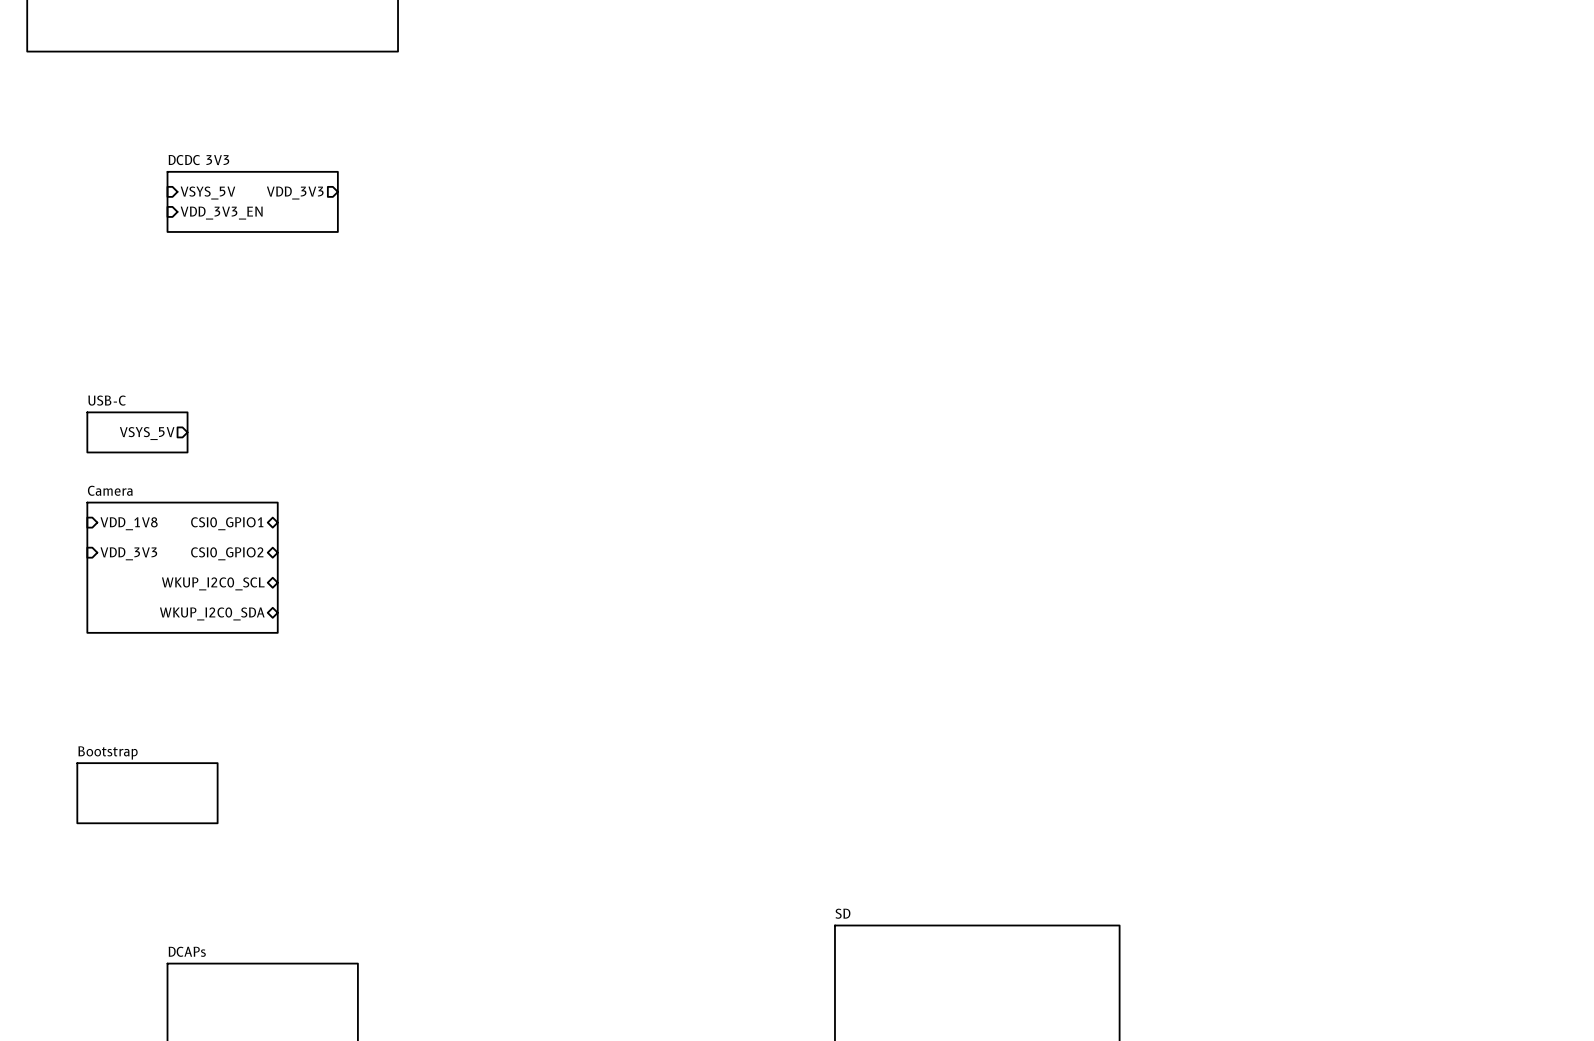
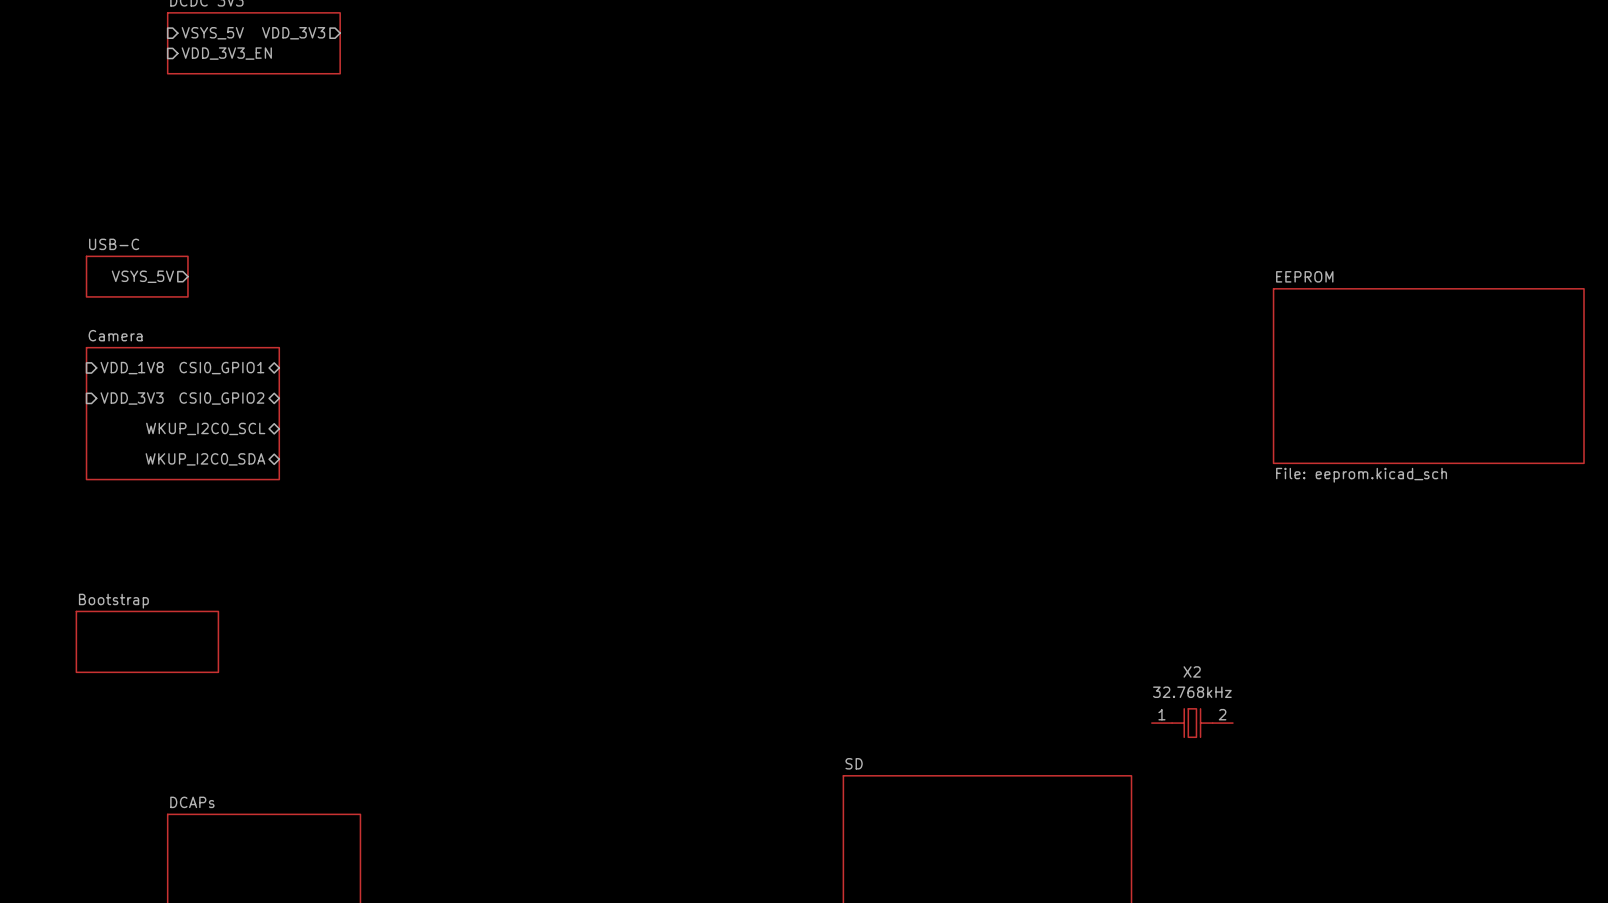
sheet EEPROM: none -> File: eeprom.kicad_sch (1428, 376)
X2: none -> (1192, 723)

